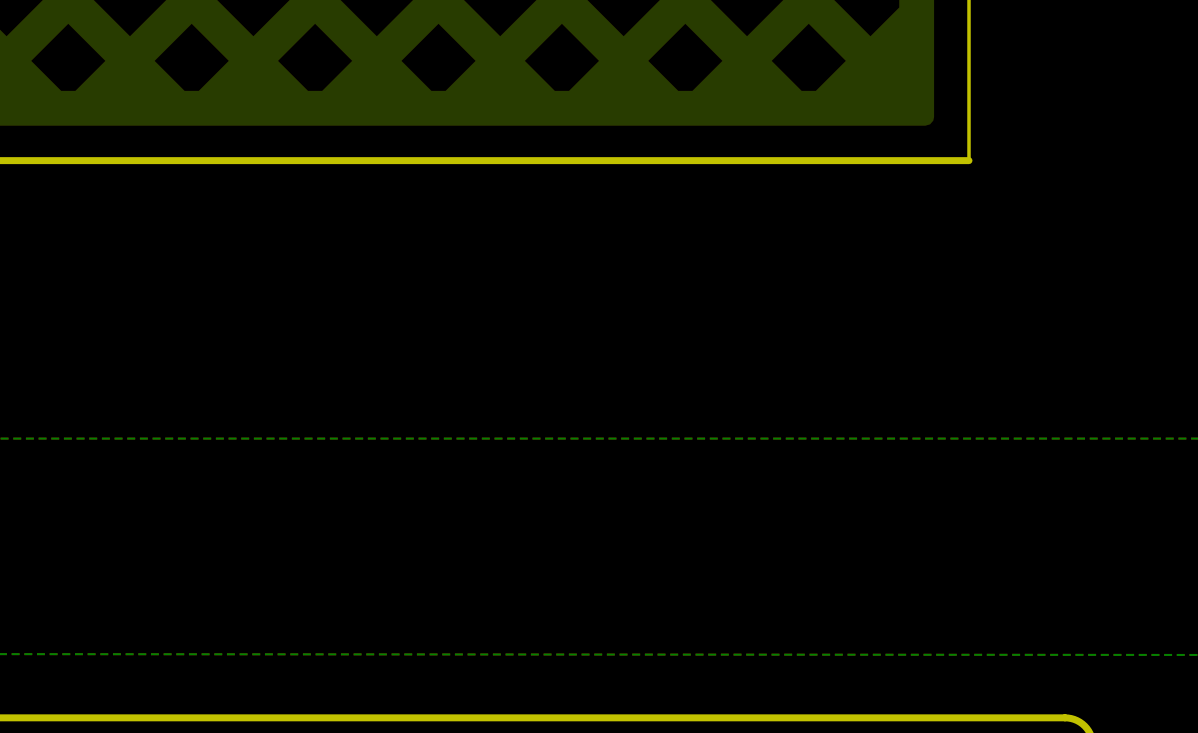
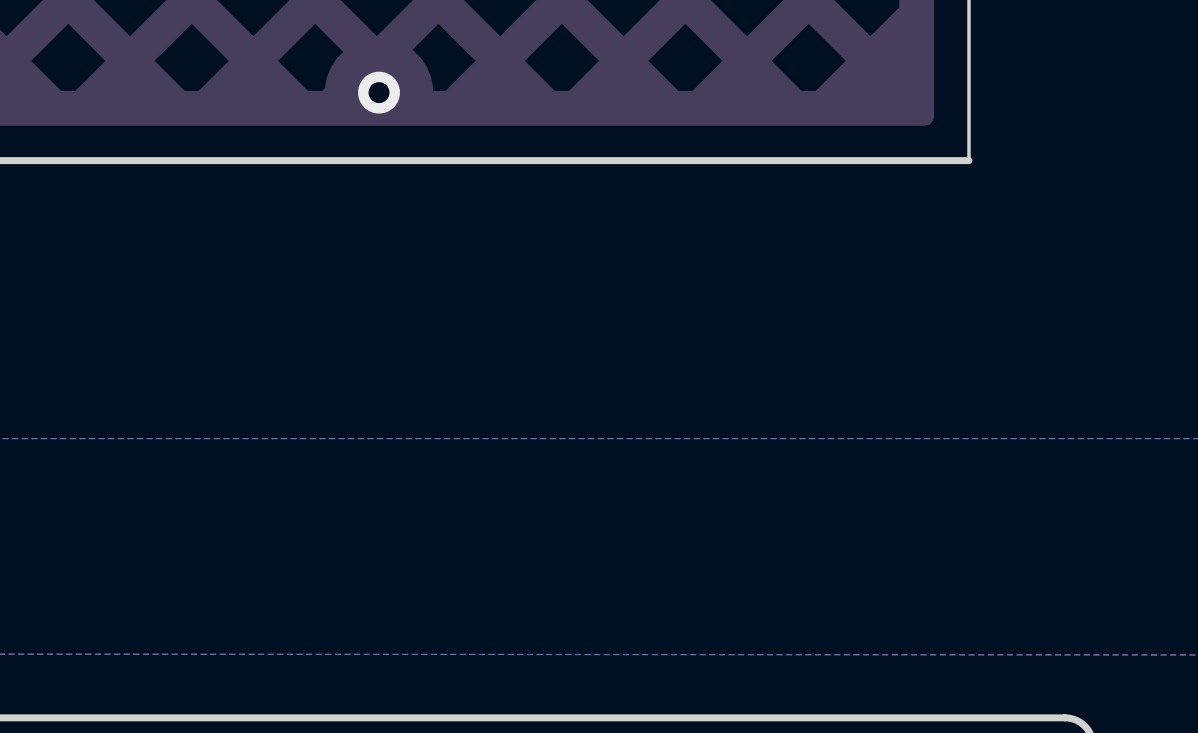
via: none -> (379, 92)

